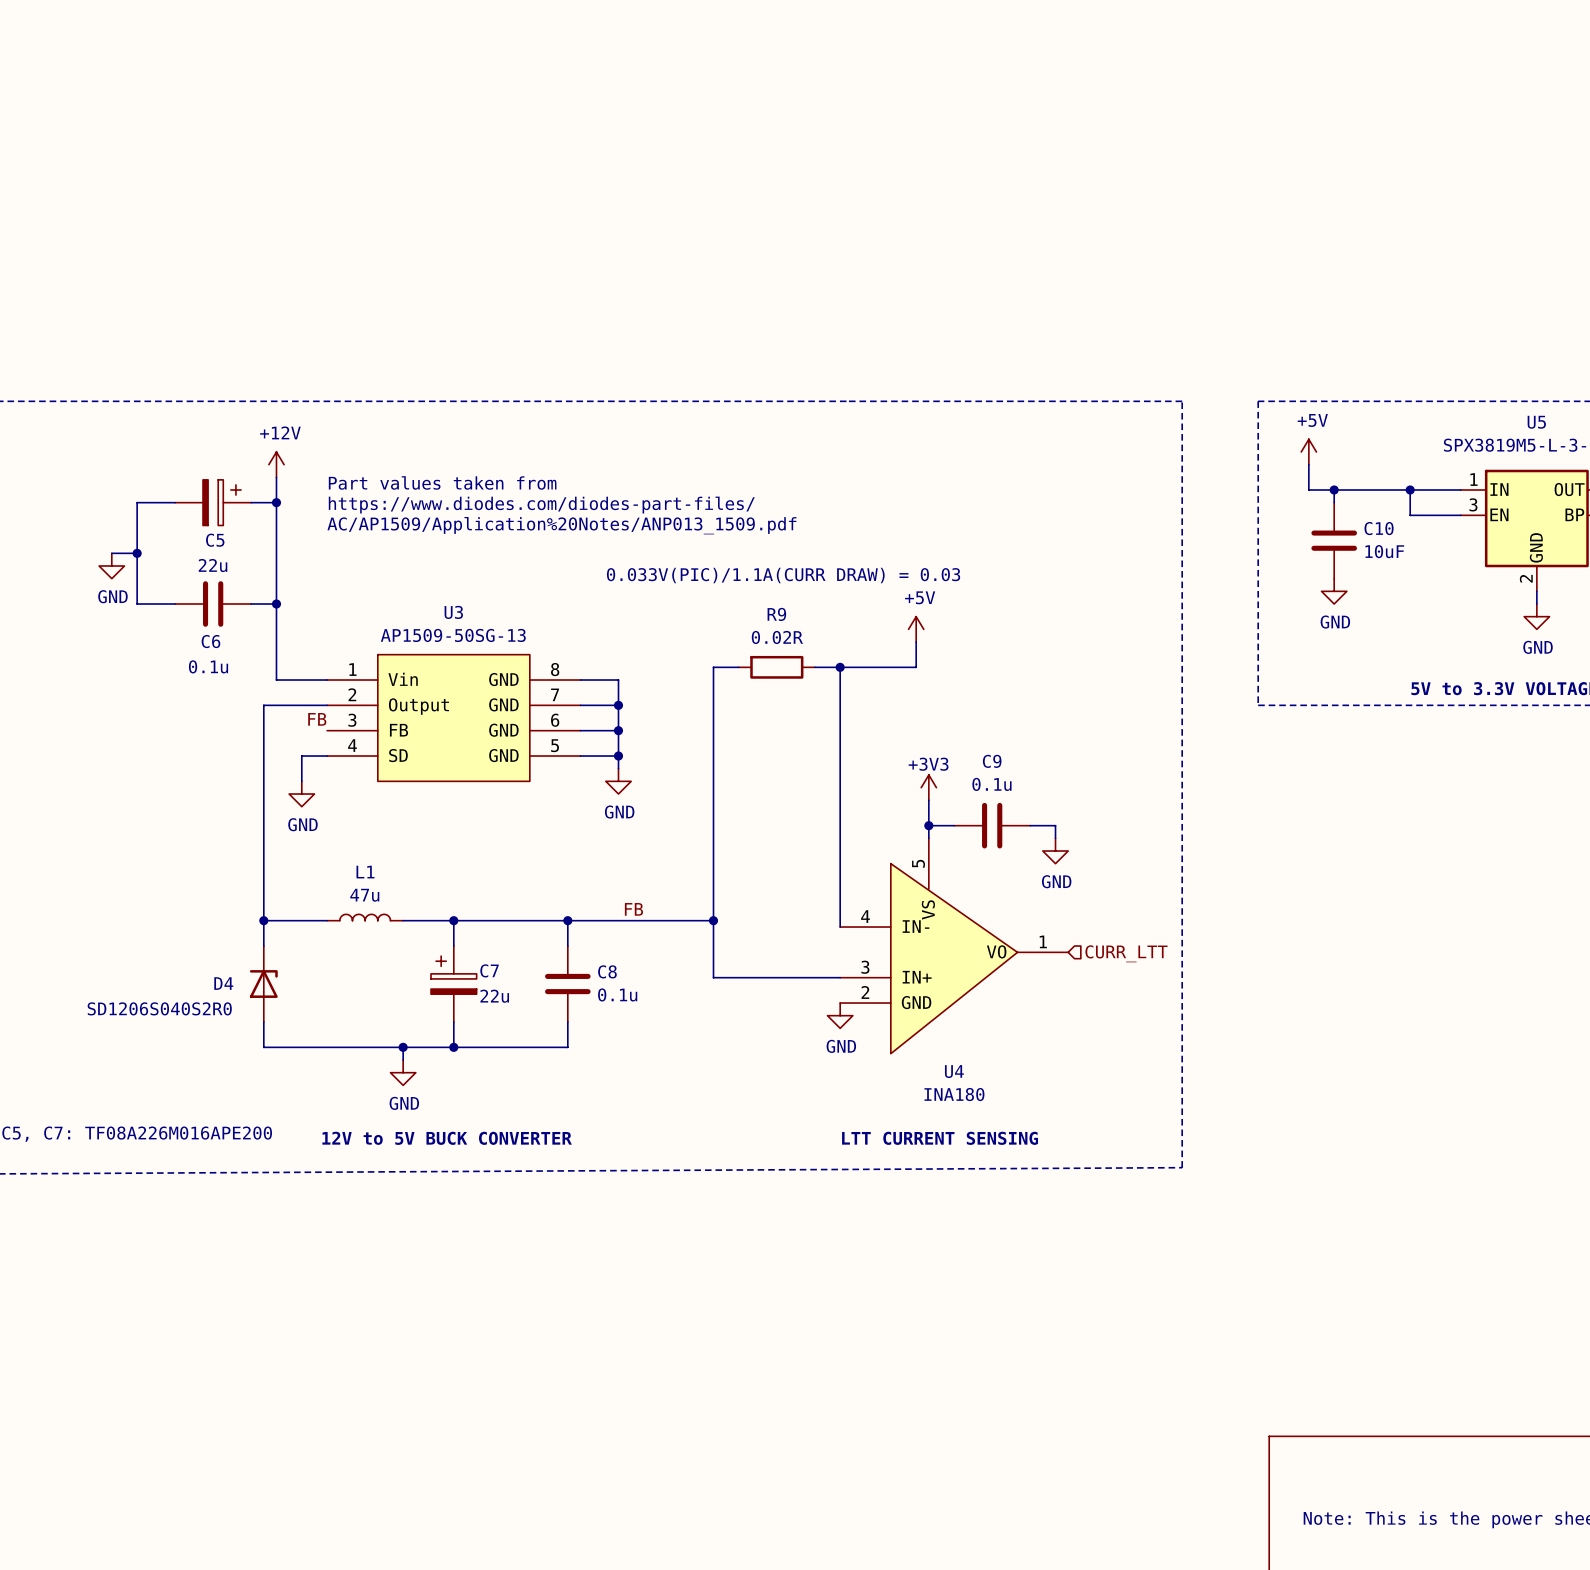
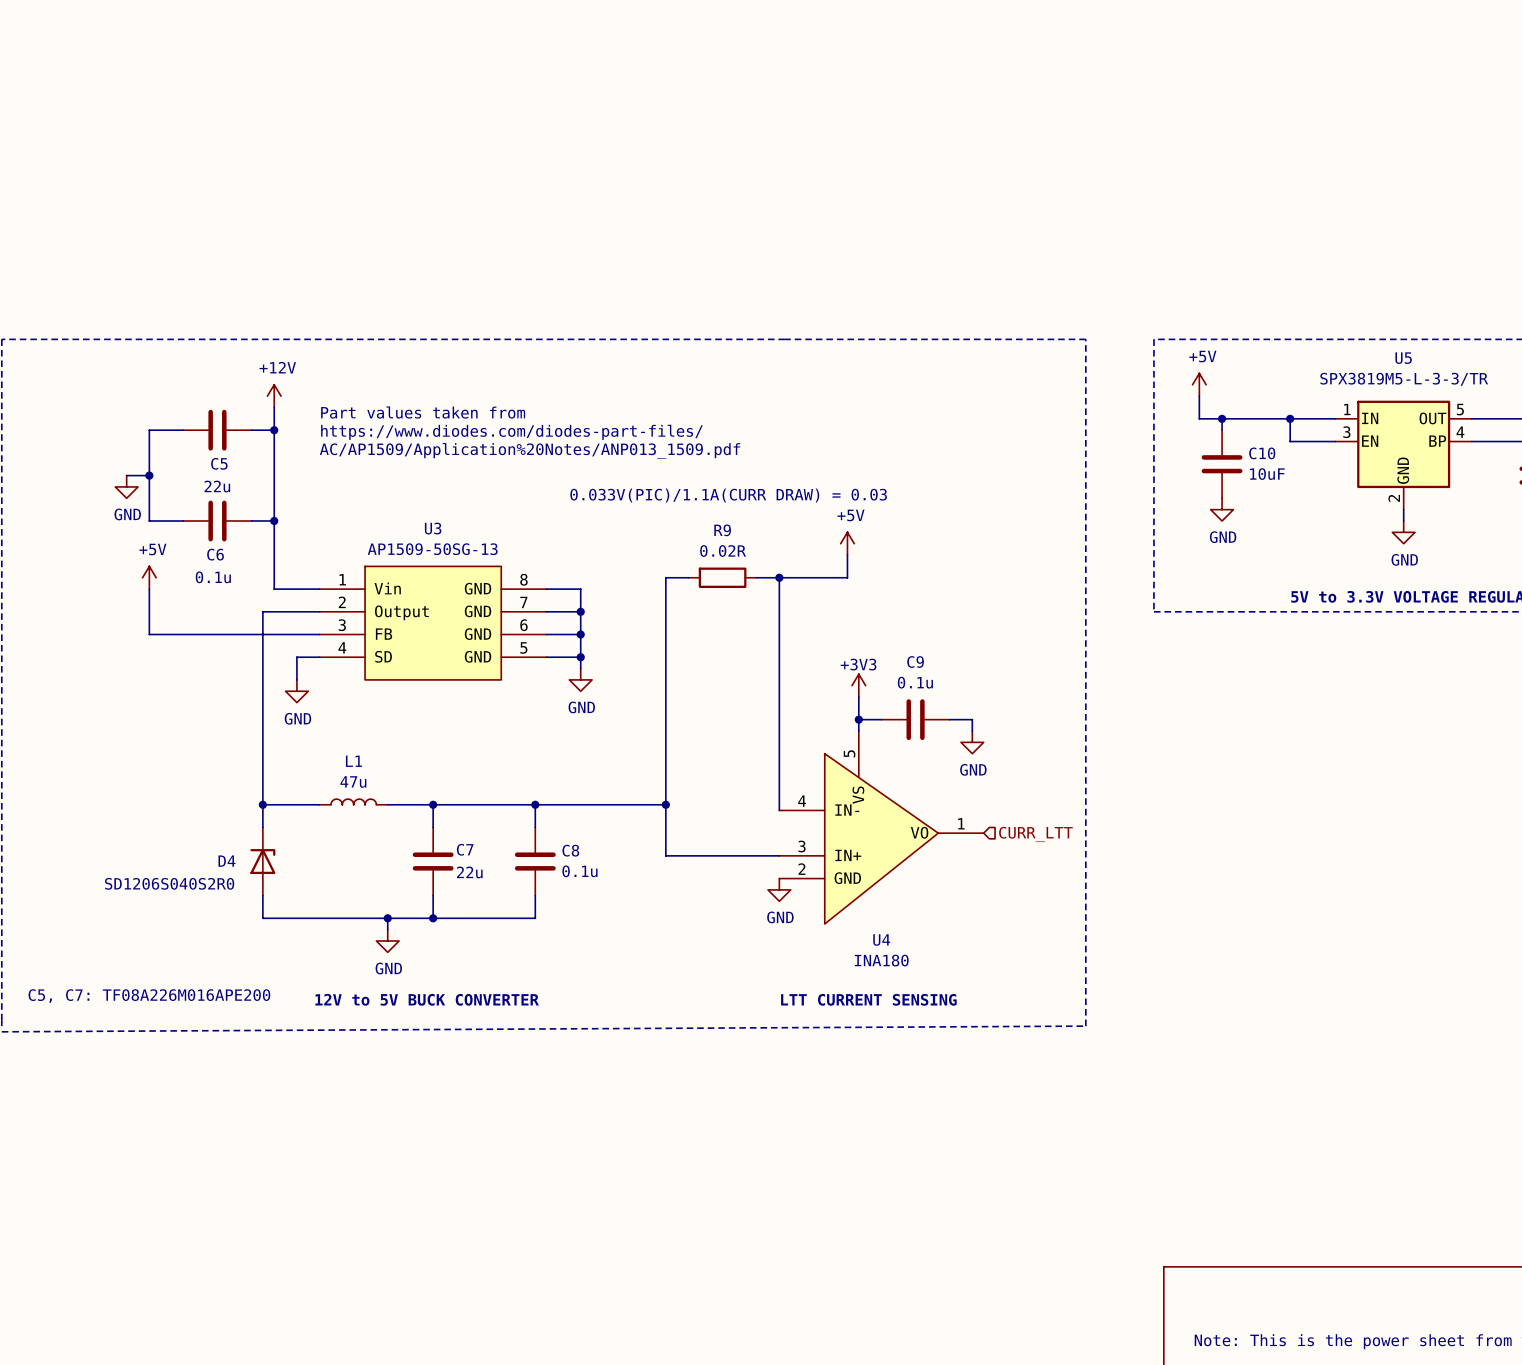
C5 symbol: [175, 479, 252, 526] -> [183, 409, 252, 451]
power symbol: none -> +5V (149, 577)
wire: none -> (149, 589) (149, 634) (319, 634)
label: FB (317, 719) -> none
label: FB (633, 909) -> none
C7 symbol: [431, 946, 477, 1023] -> [412, 827, 454, 896]

